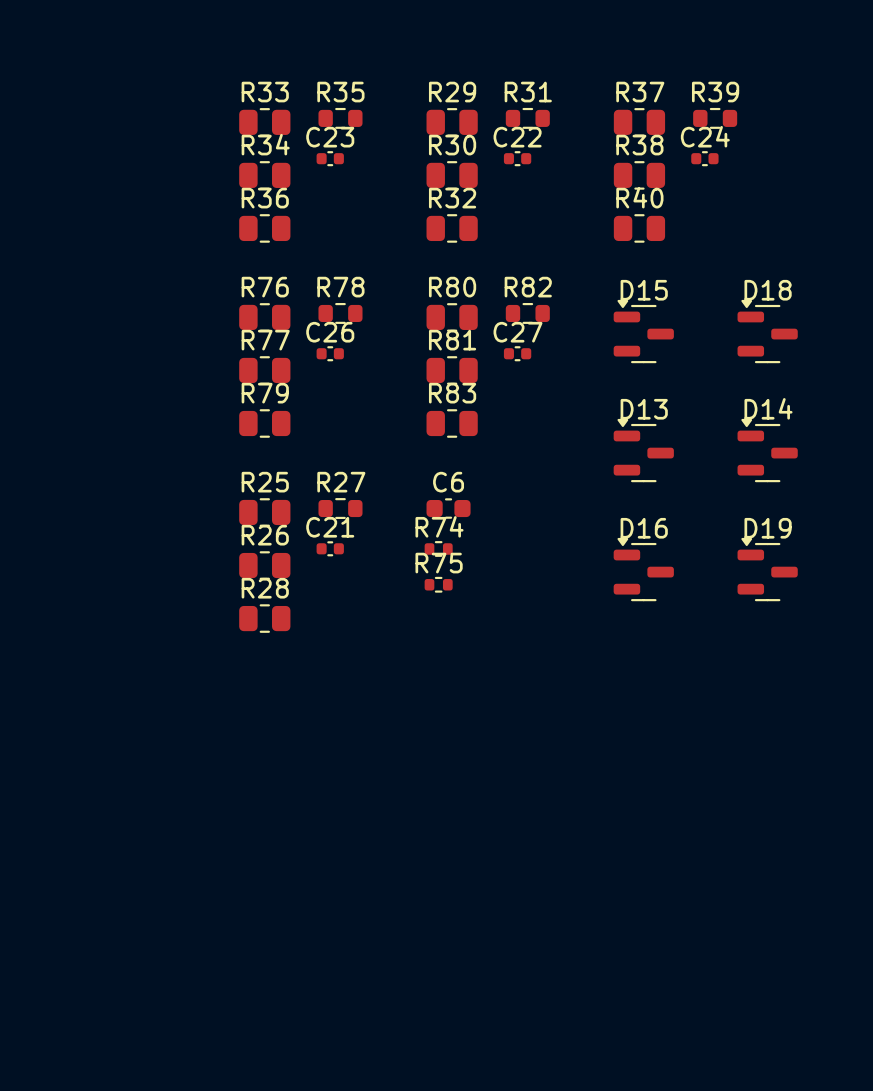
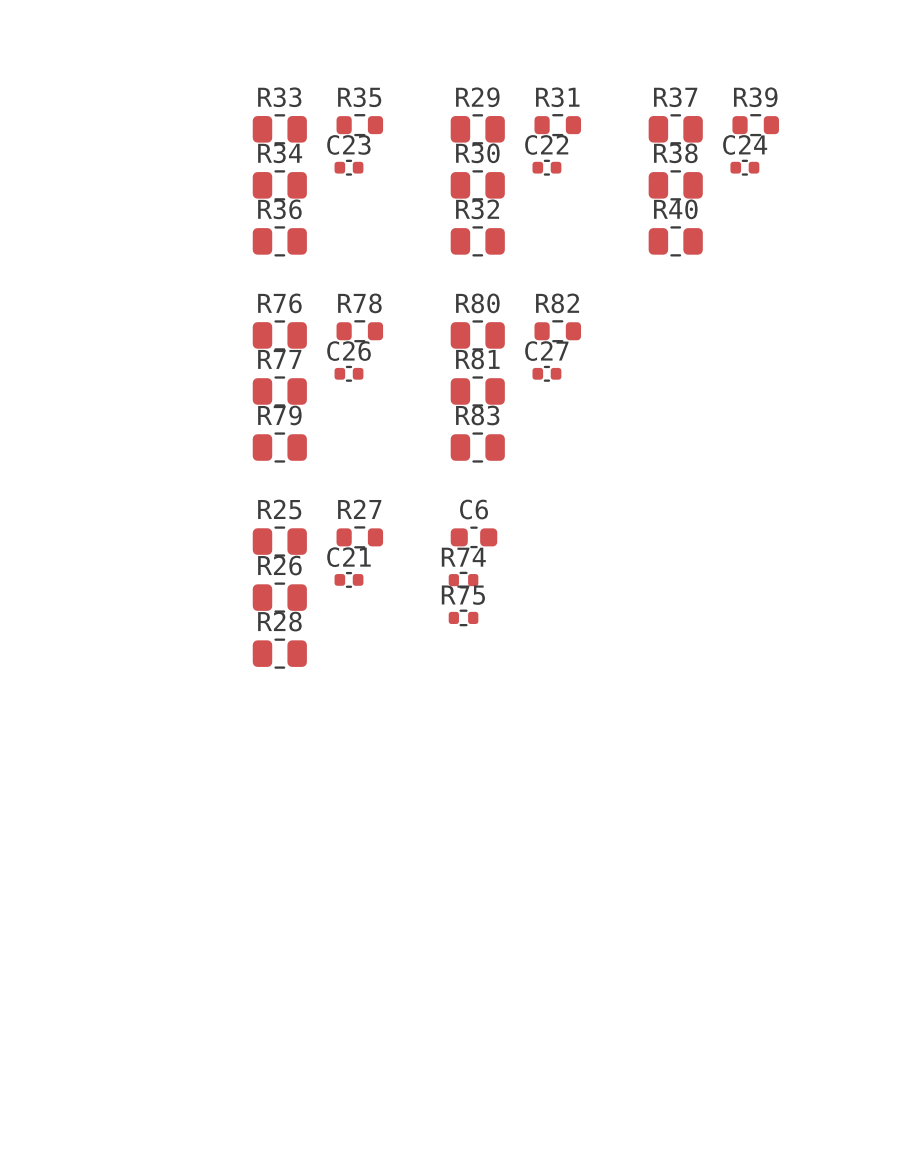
D15: (643, 331) -> none
D18: (767, 331) -> none
D13: (643, 450) -> none
D14: (767, 450) -> none
D16: (643, 569) -> none
D19: (767, 569) -> none

